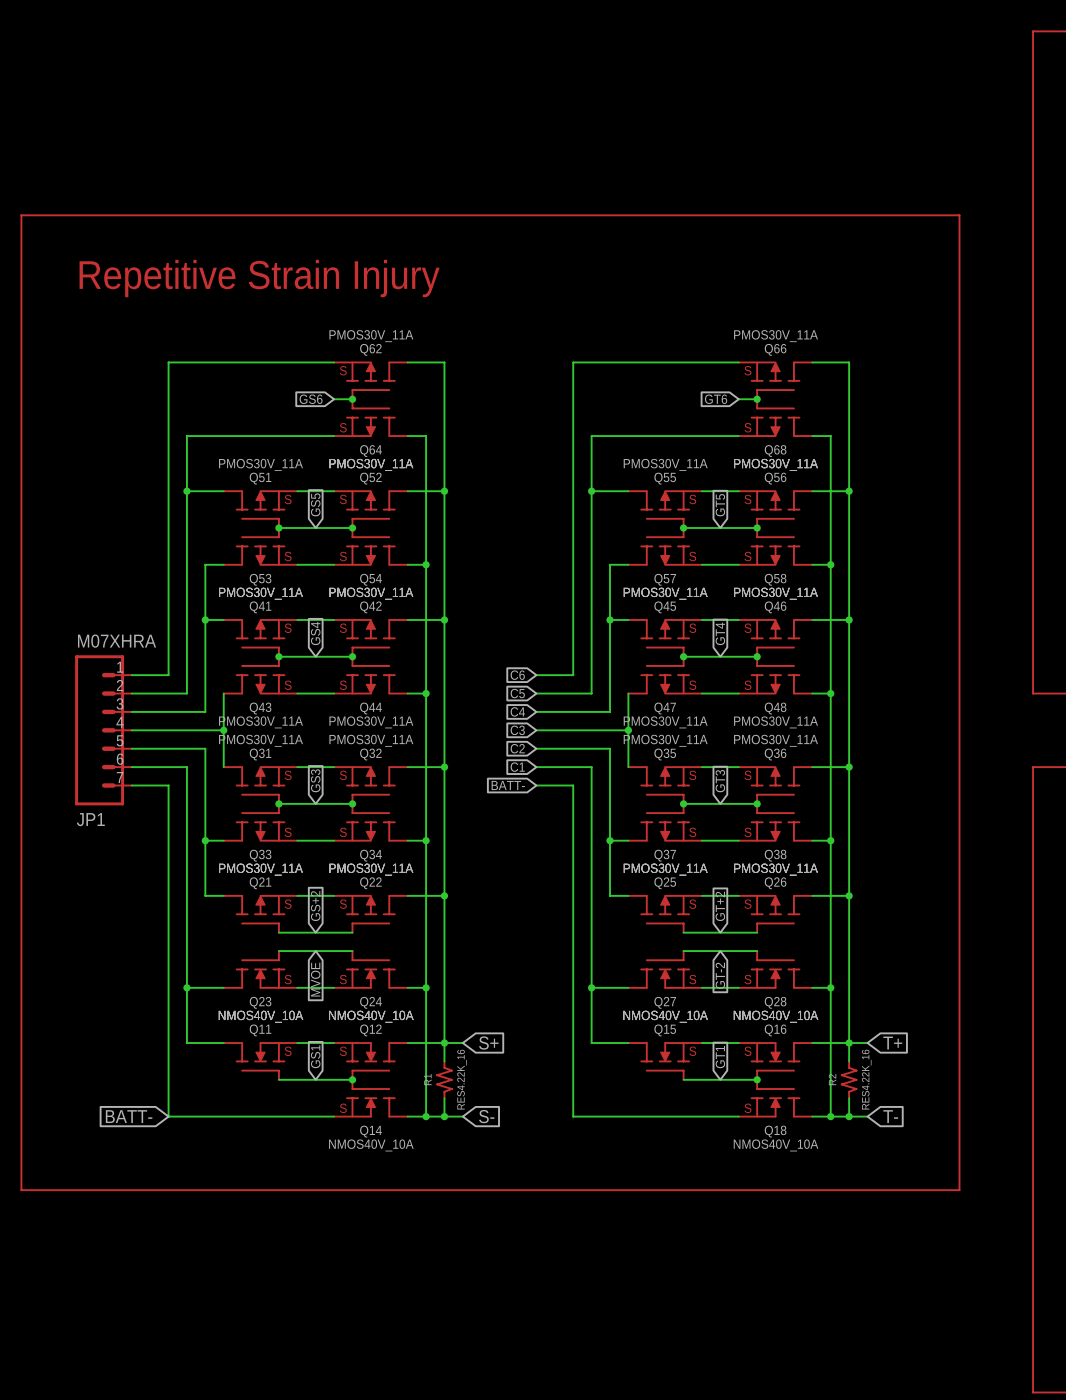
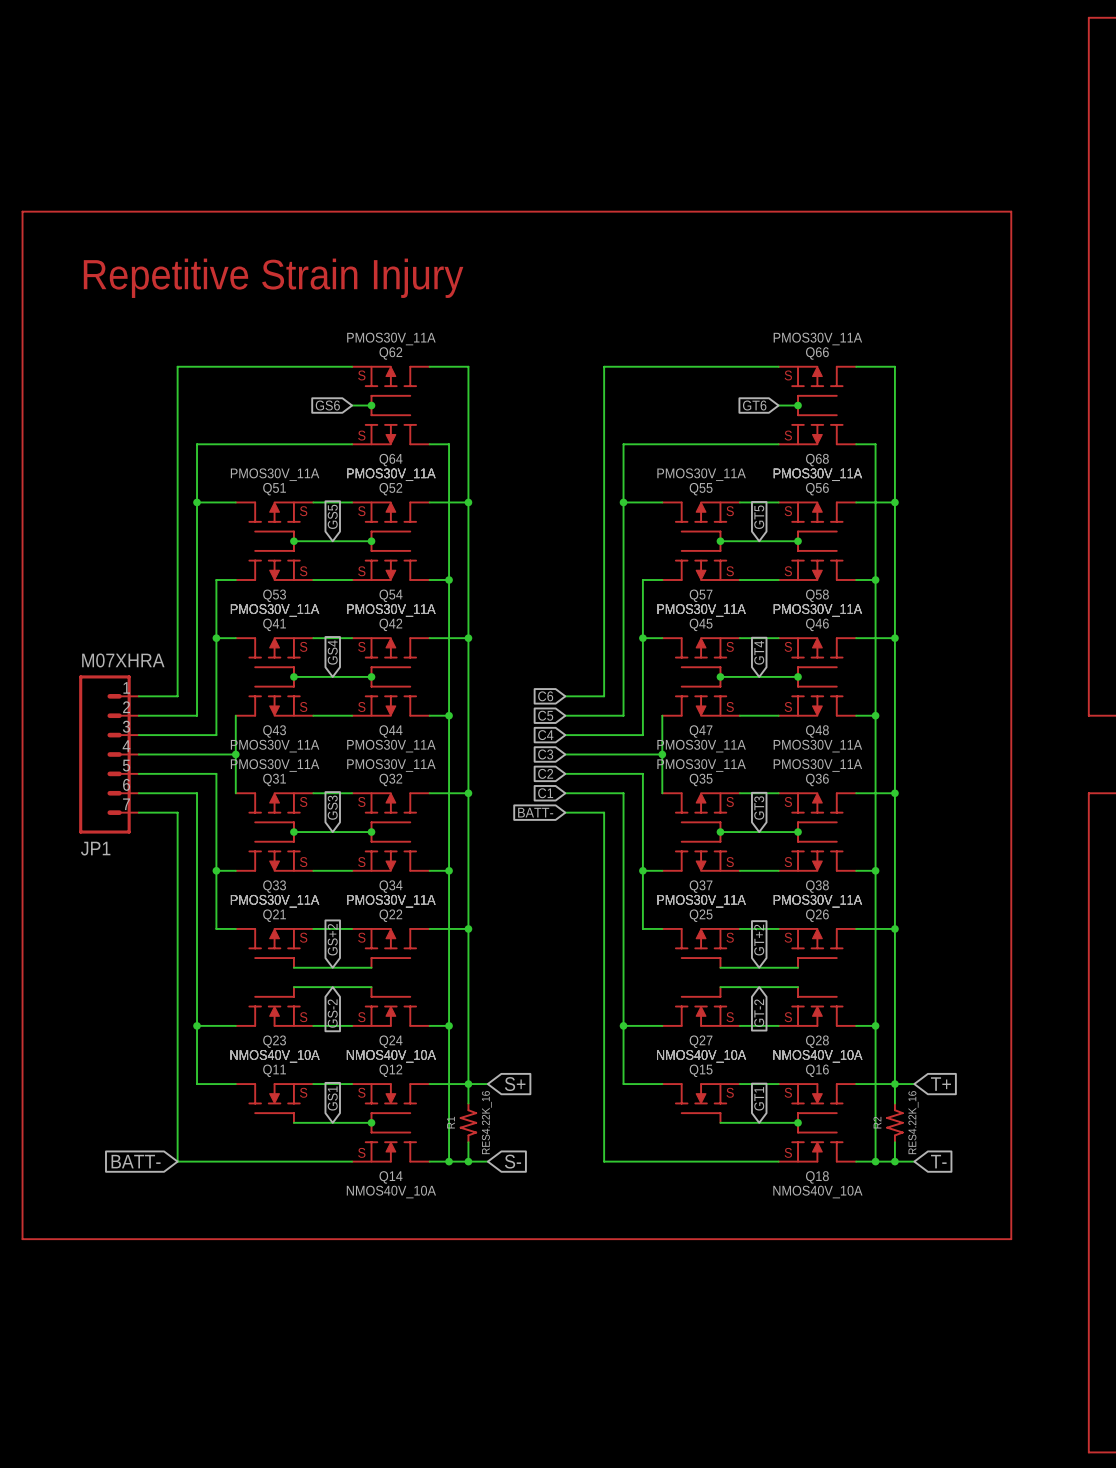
global label: MVOE (315, 979) -> GS-2 (332, 1013)

